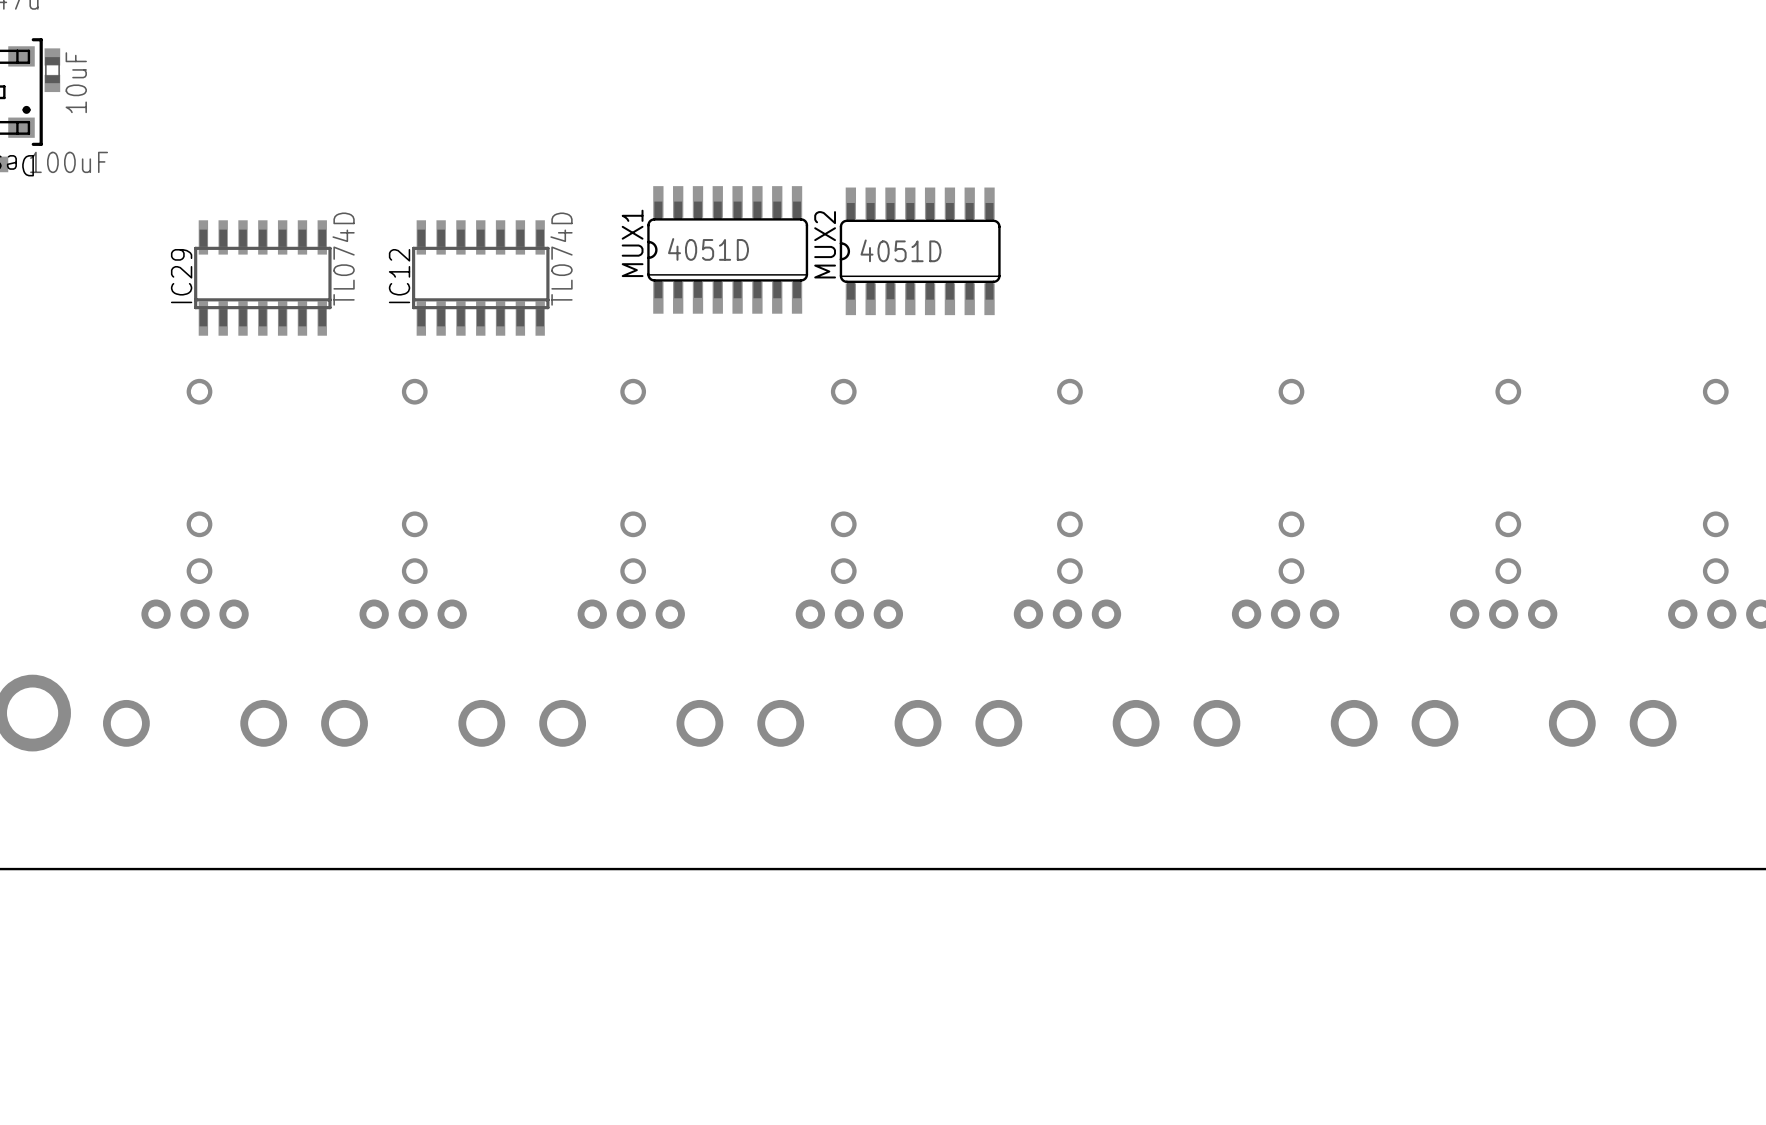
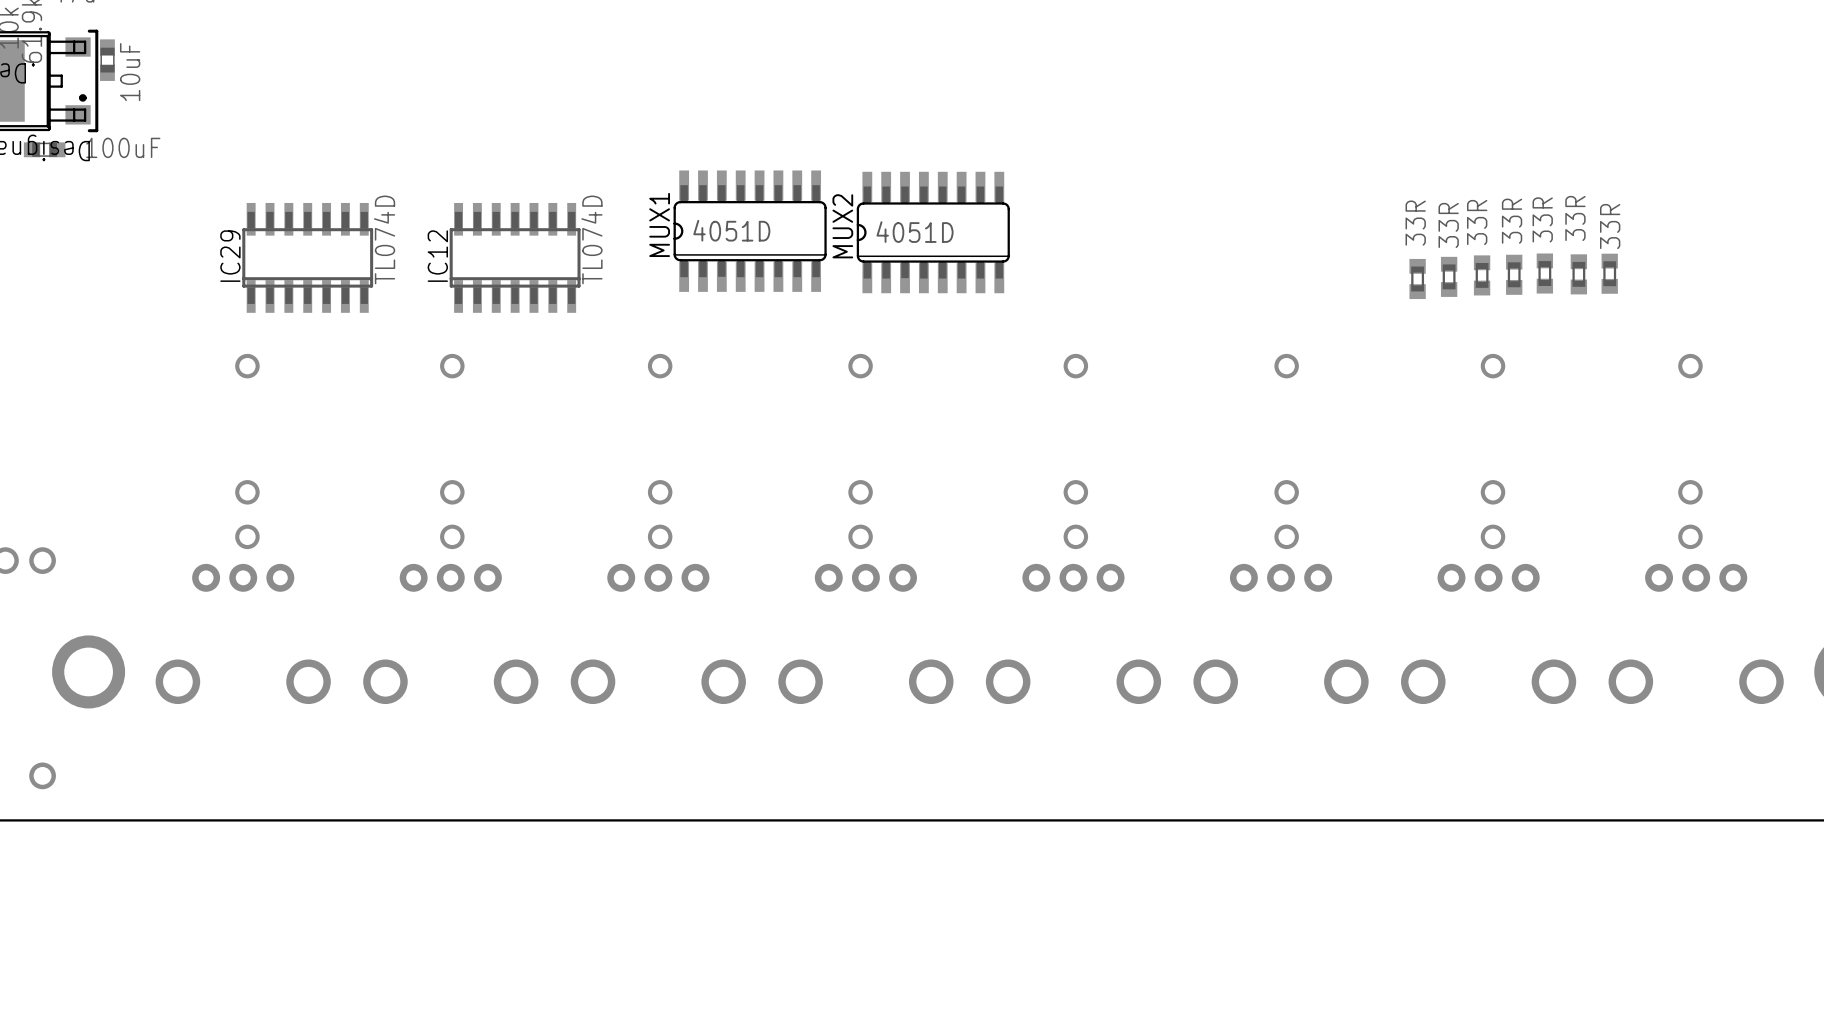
part: none -> 33R (1544, 273)
part: none -> 33R (1609, 273)
part: none -> 33R (1514, 274)
part: none -> 33R (1578, 274)
part: none -> 33R (1482, 275)
part: none -> 33R (1449, 276)
part: none -> 33R (1417, 278)

